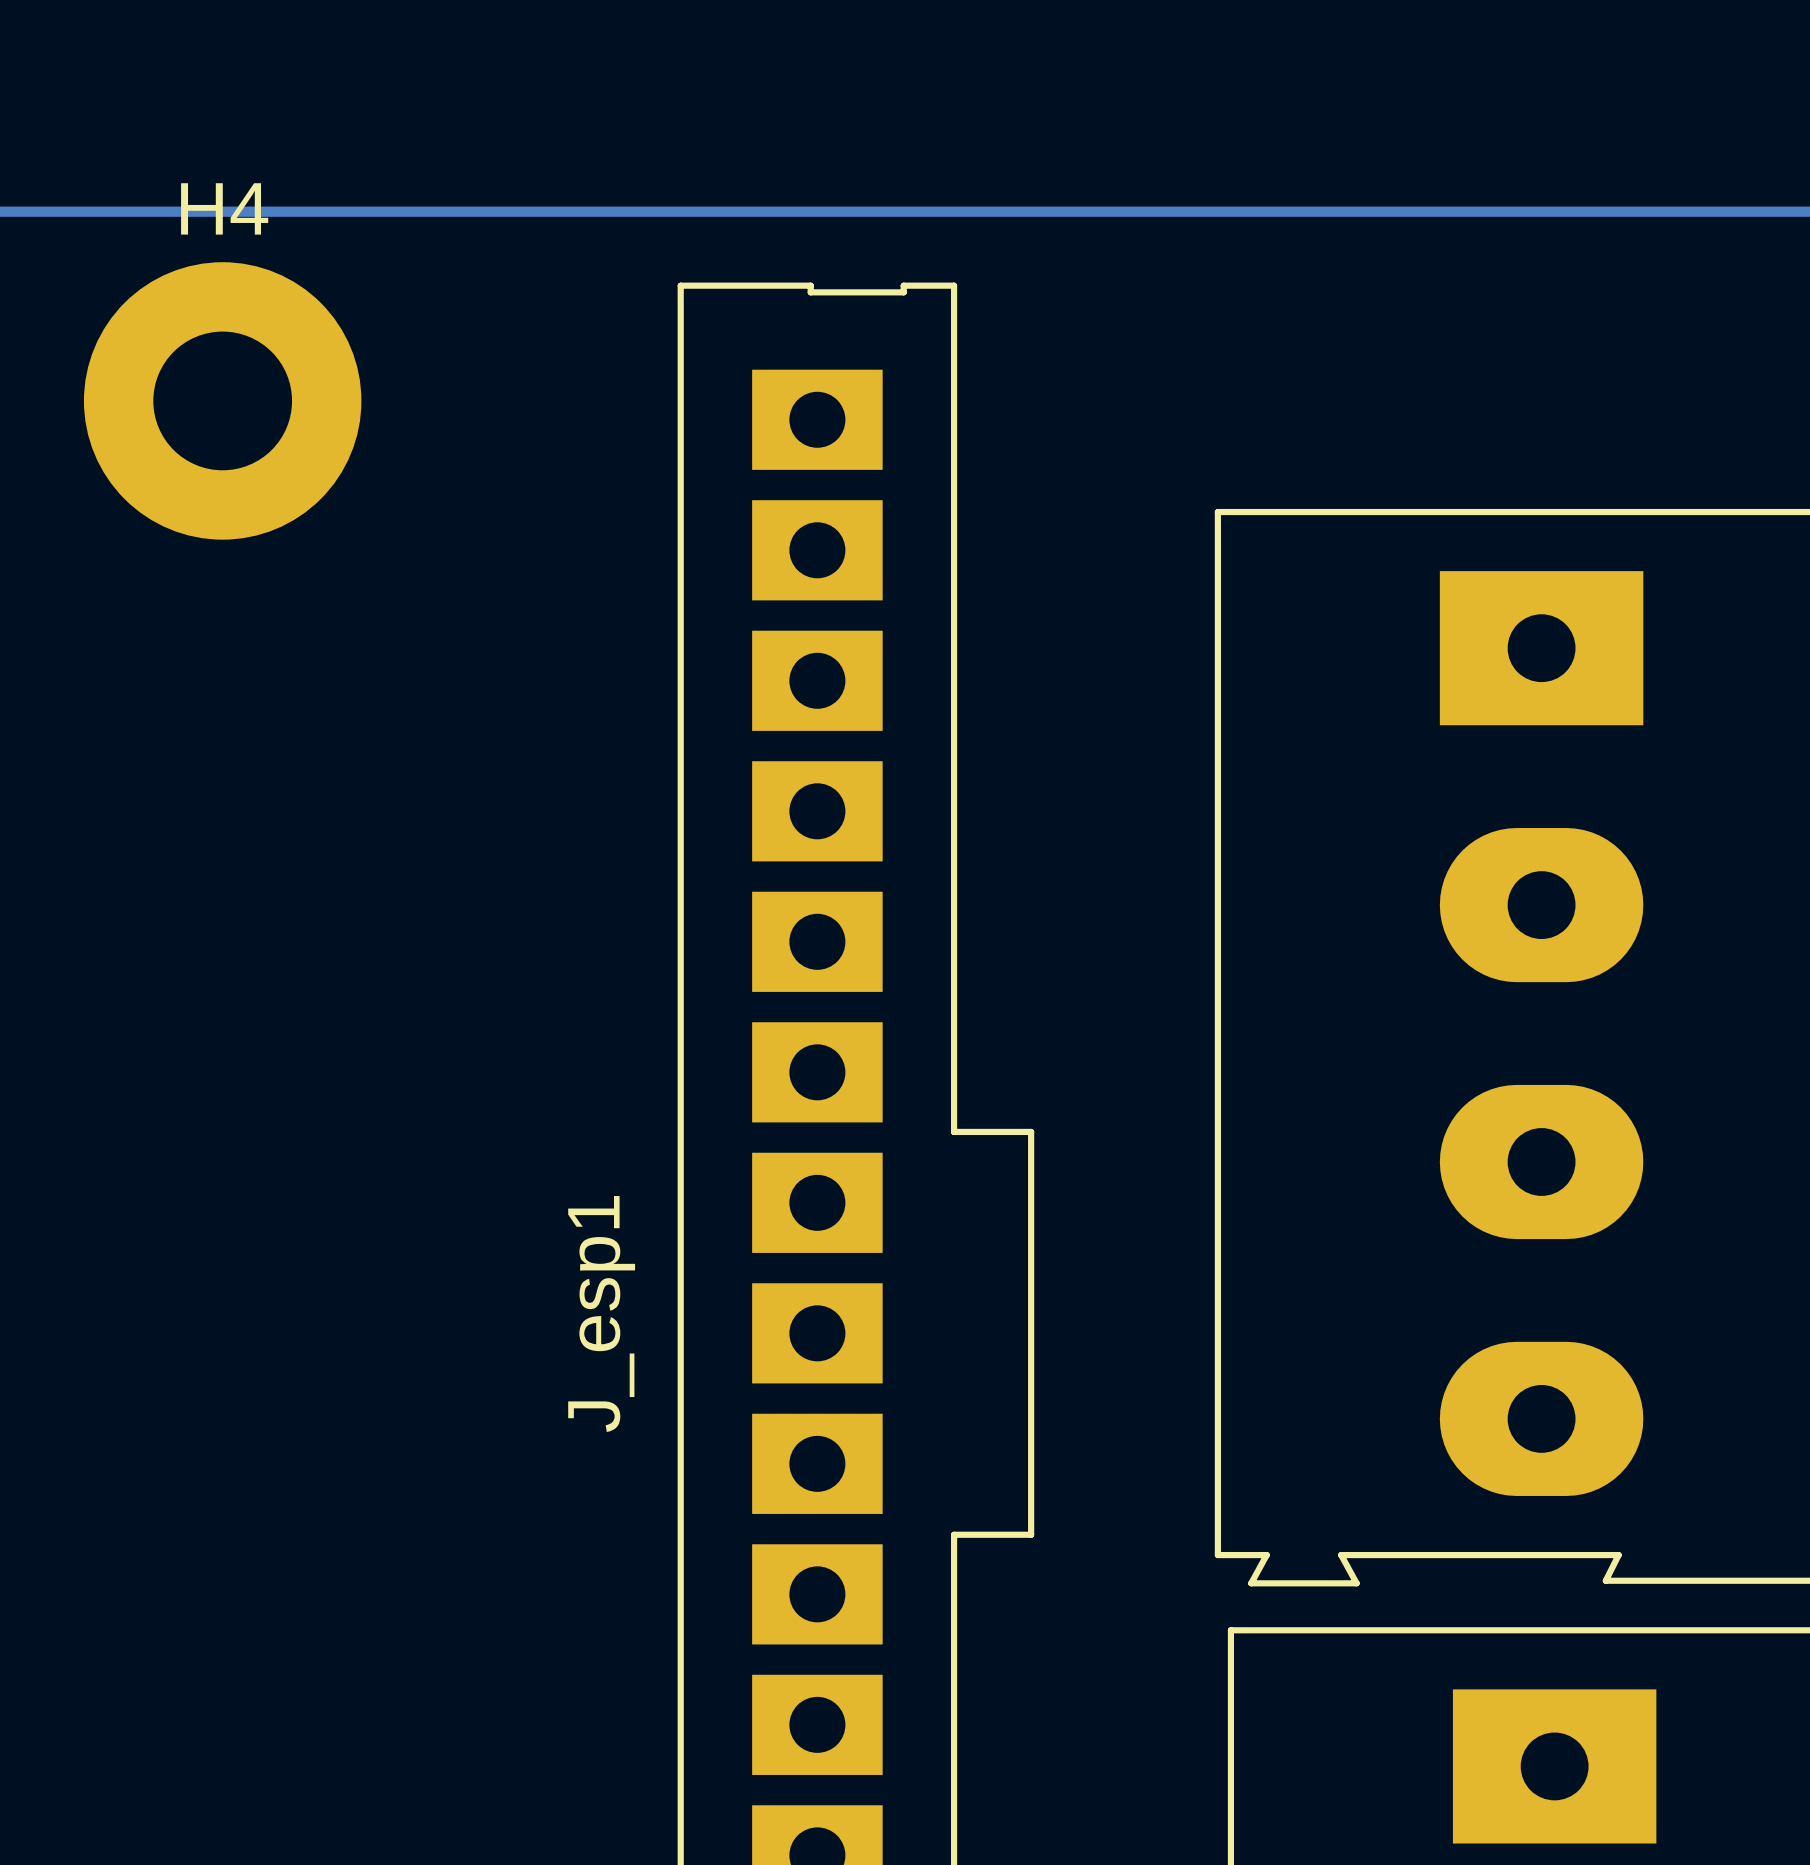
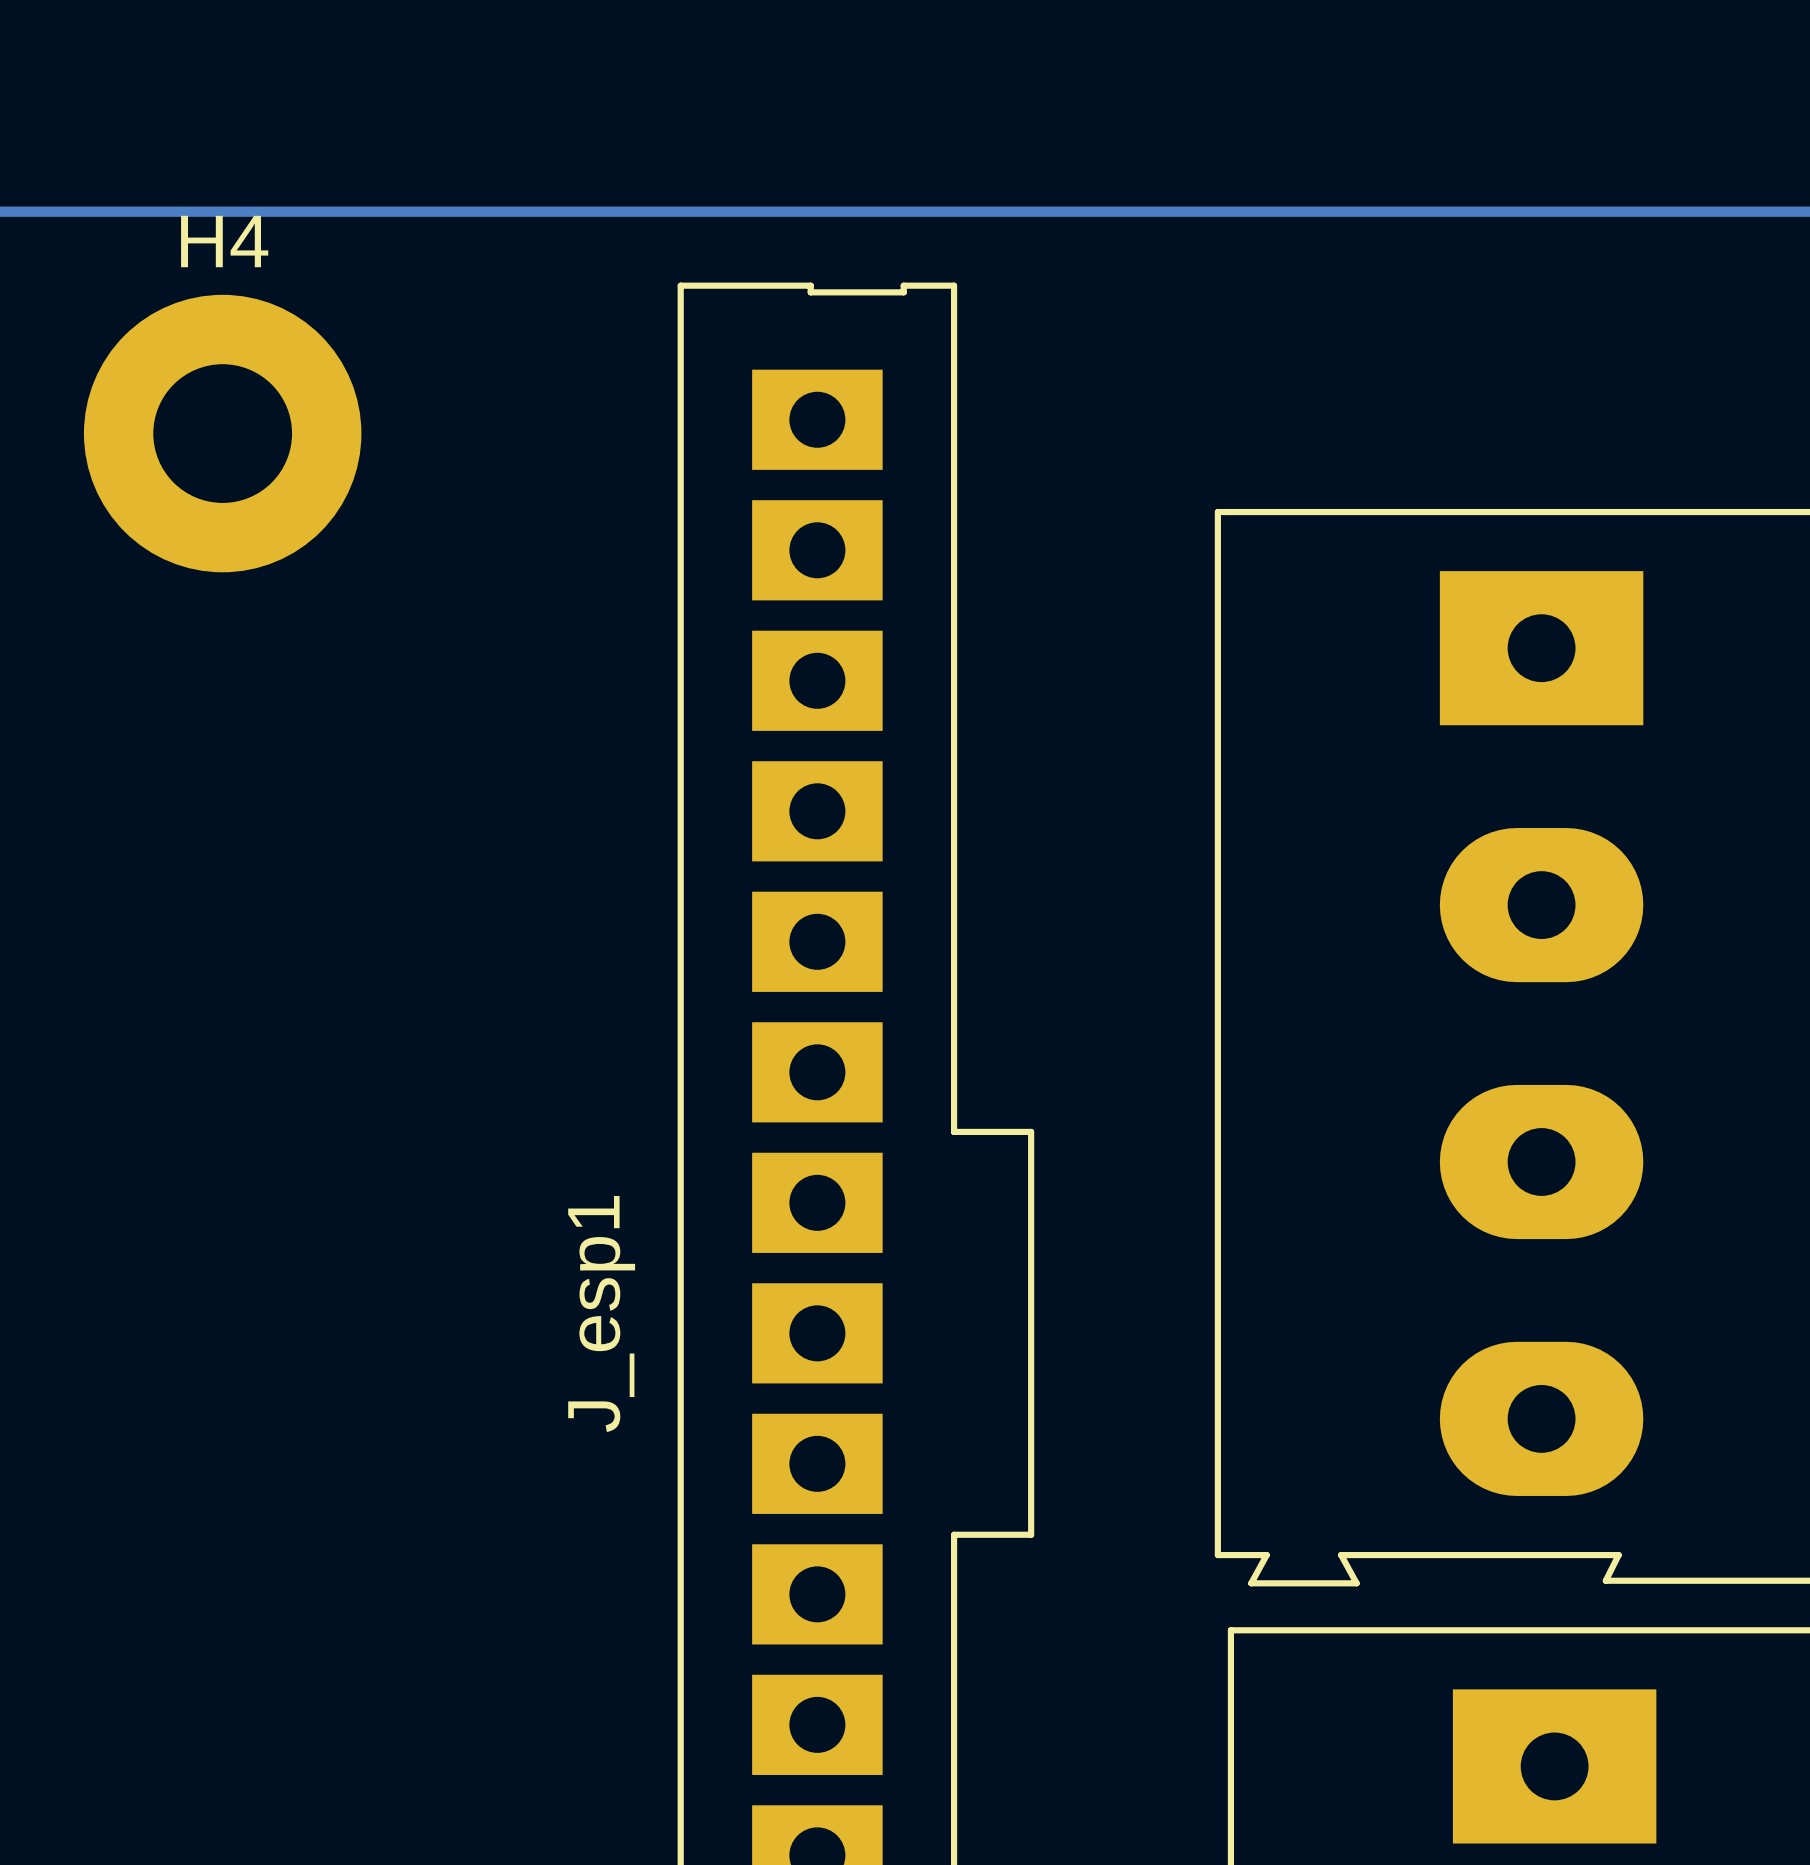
H4 position: (222, 400) -> (222, 433)

